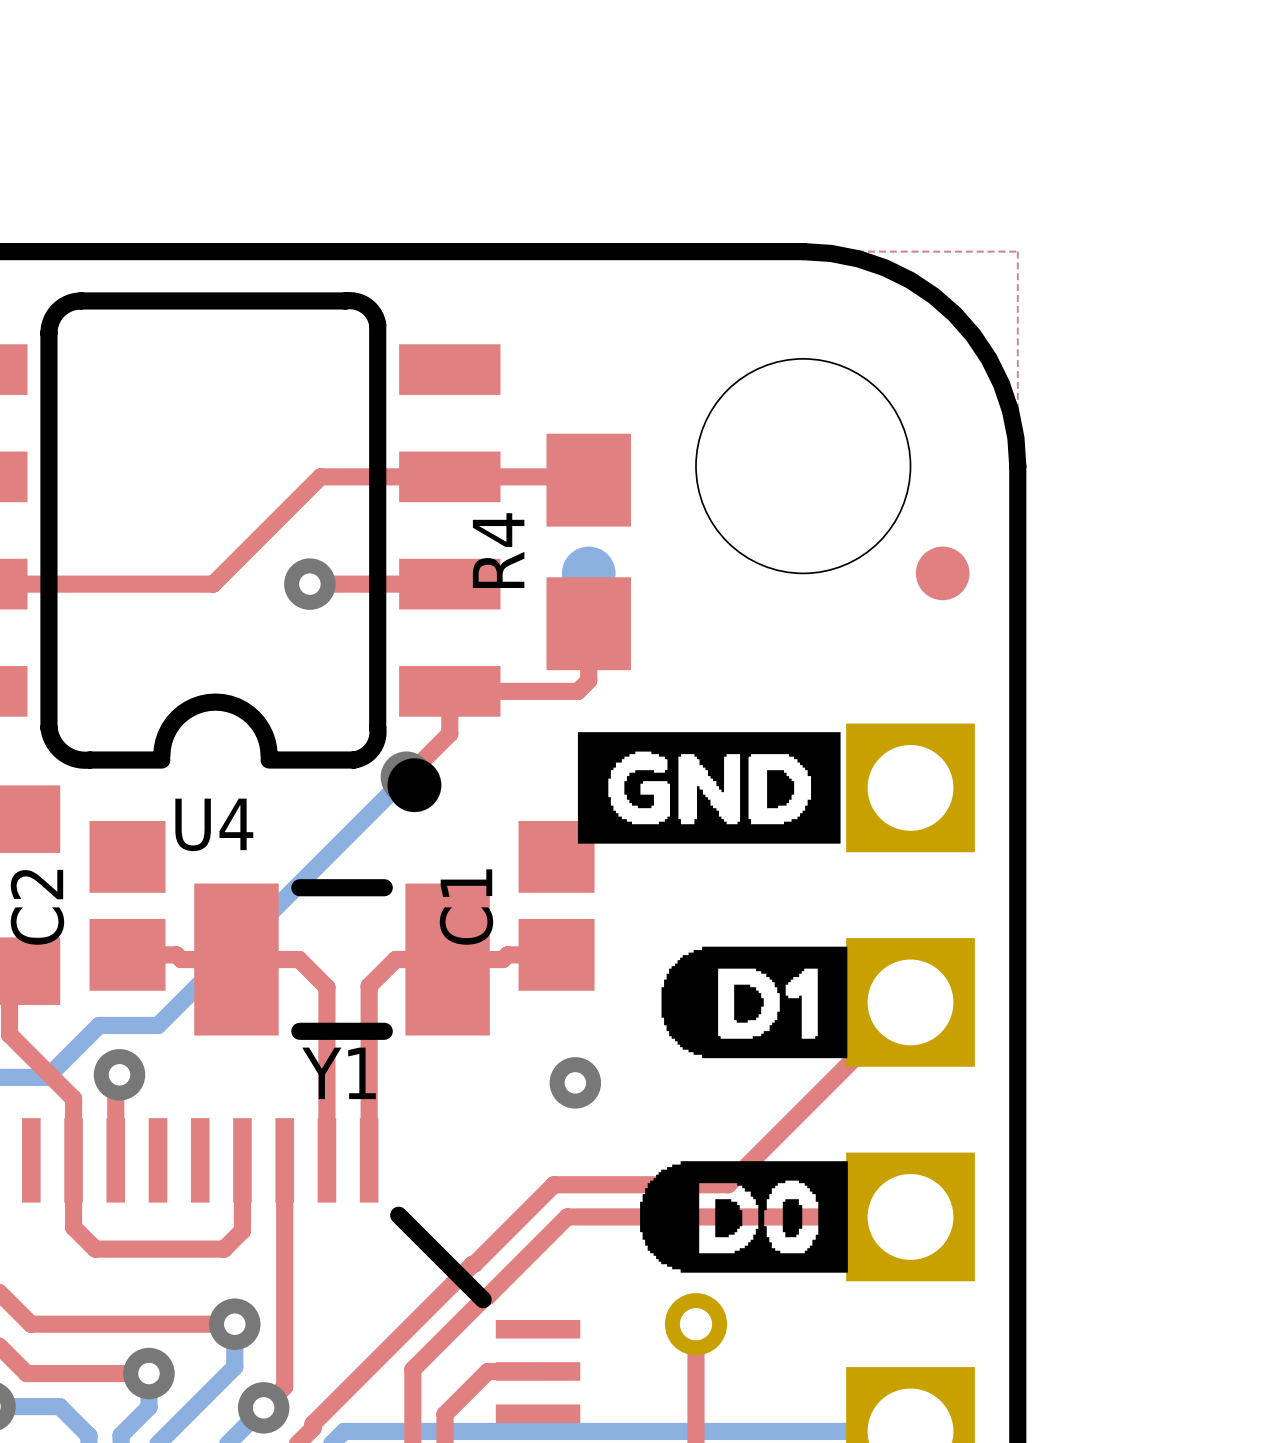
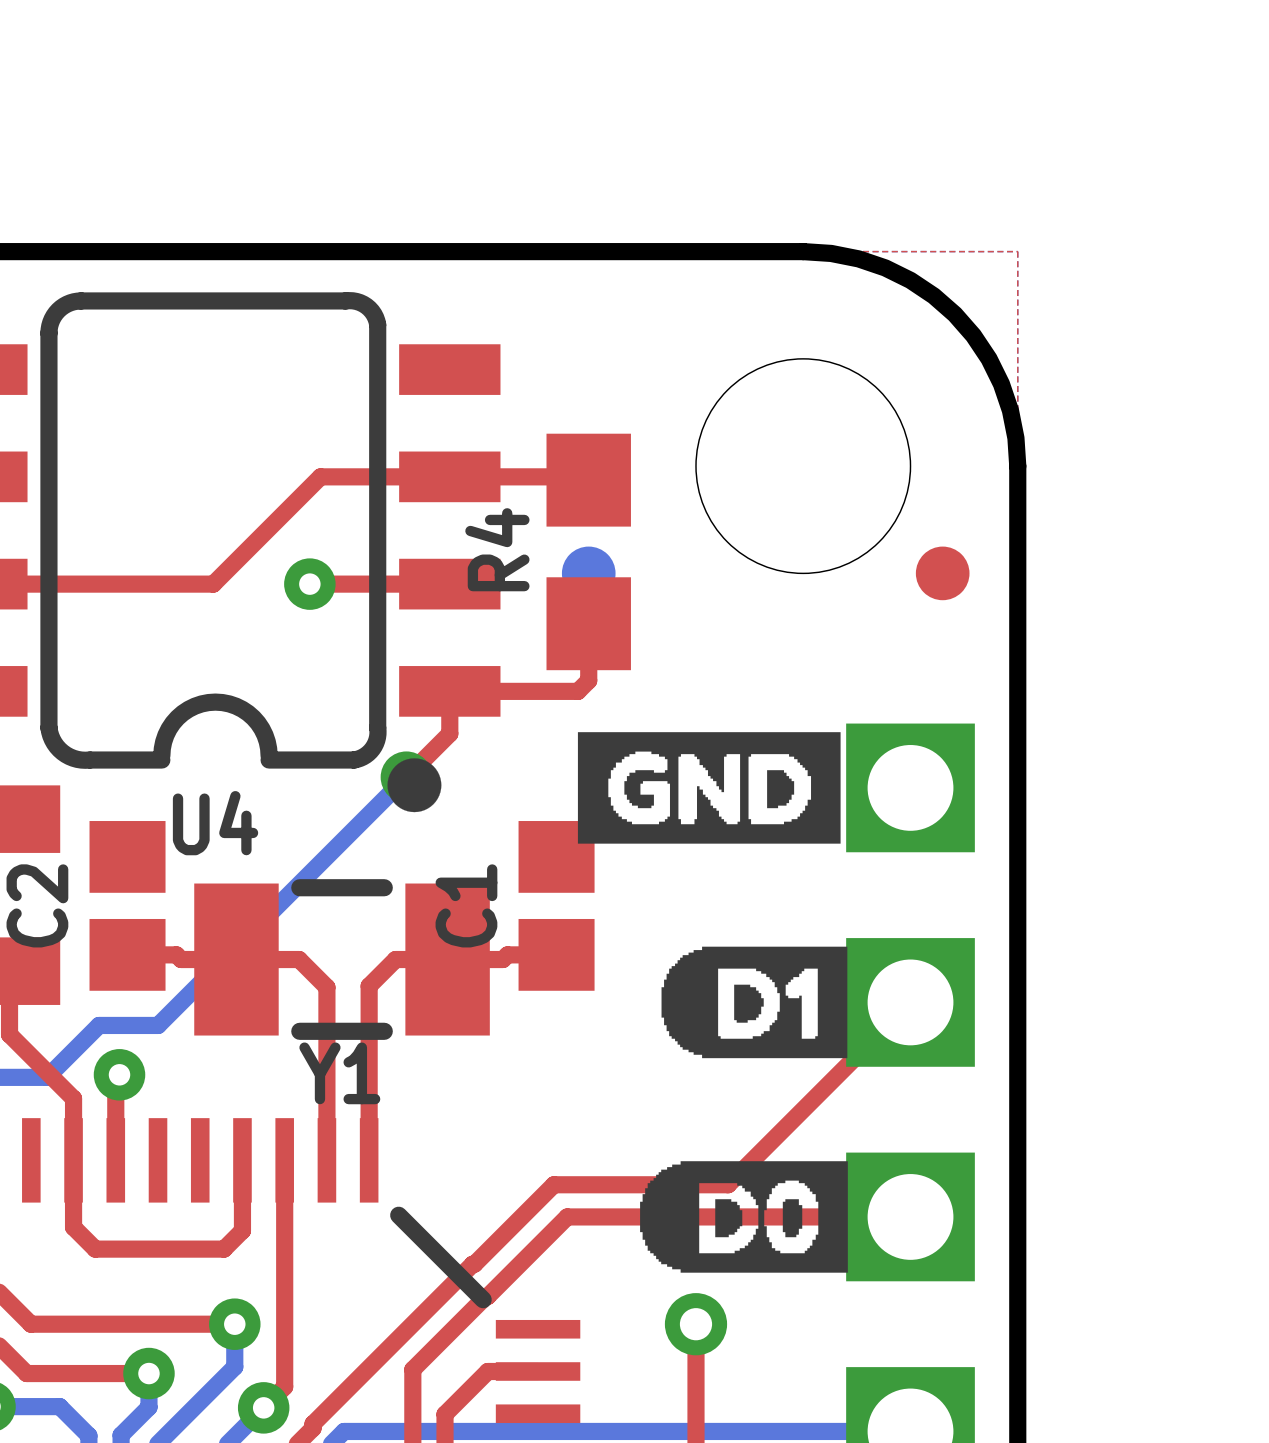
via: (575, 1082) -> none

